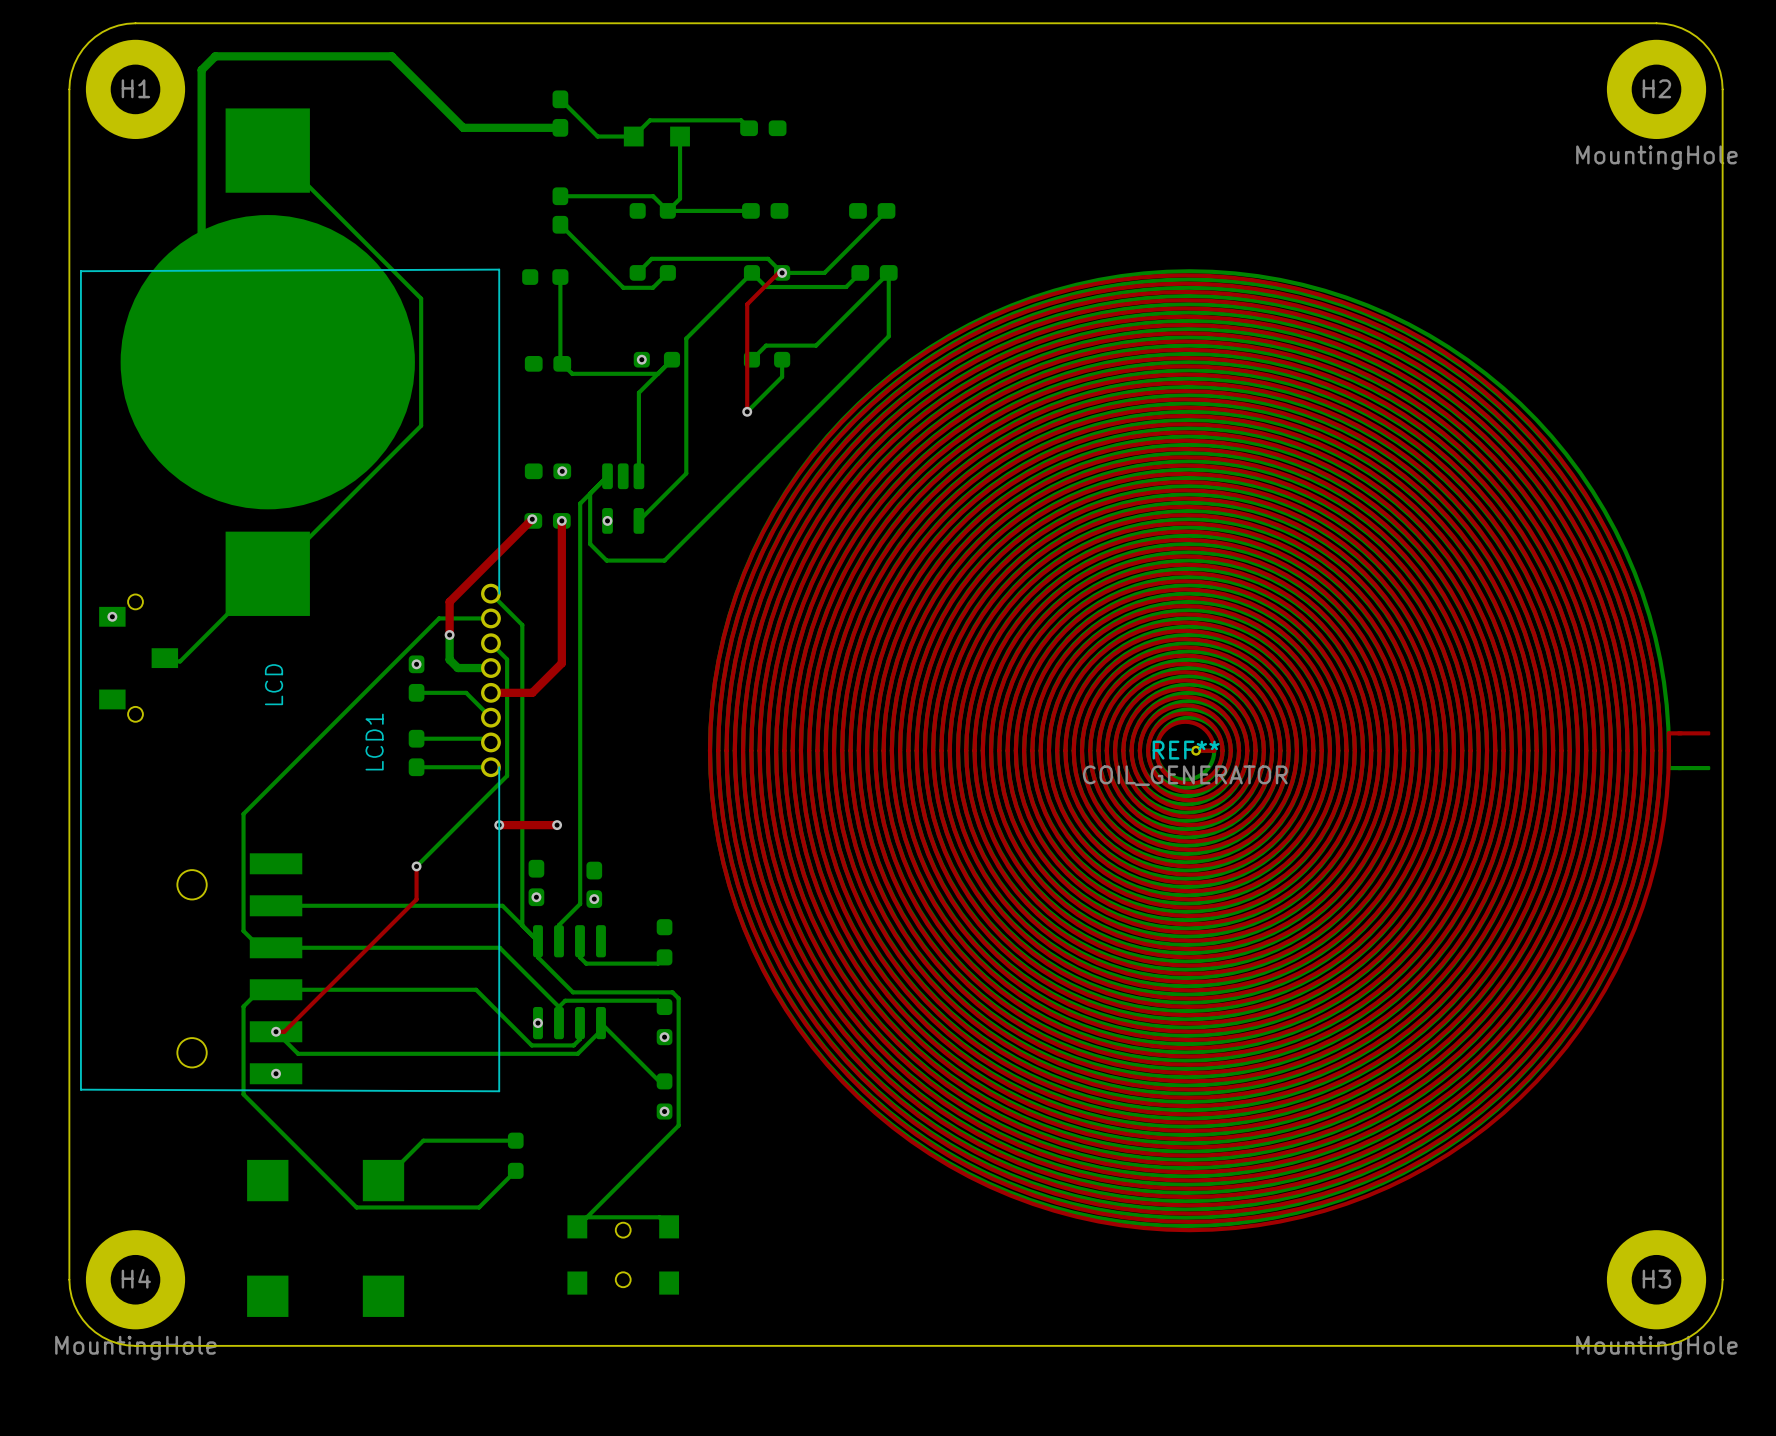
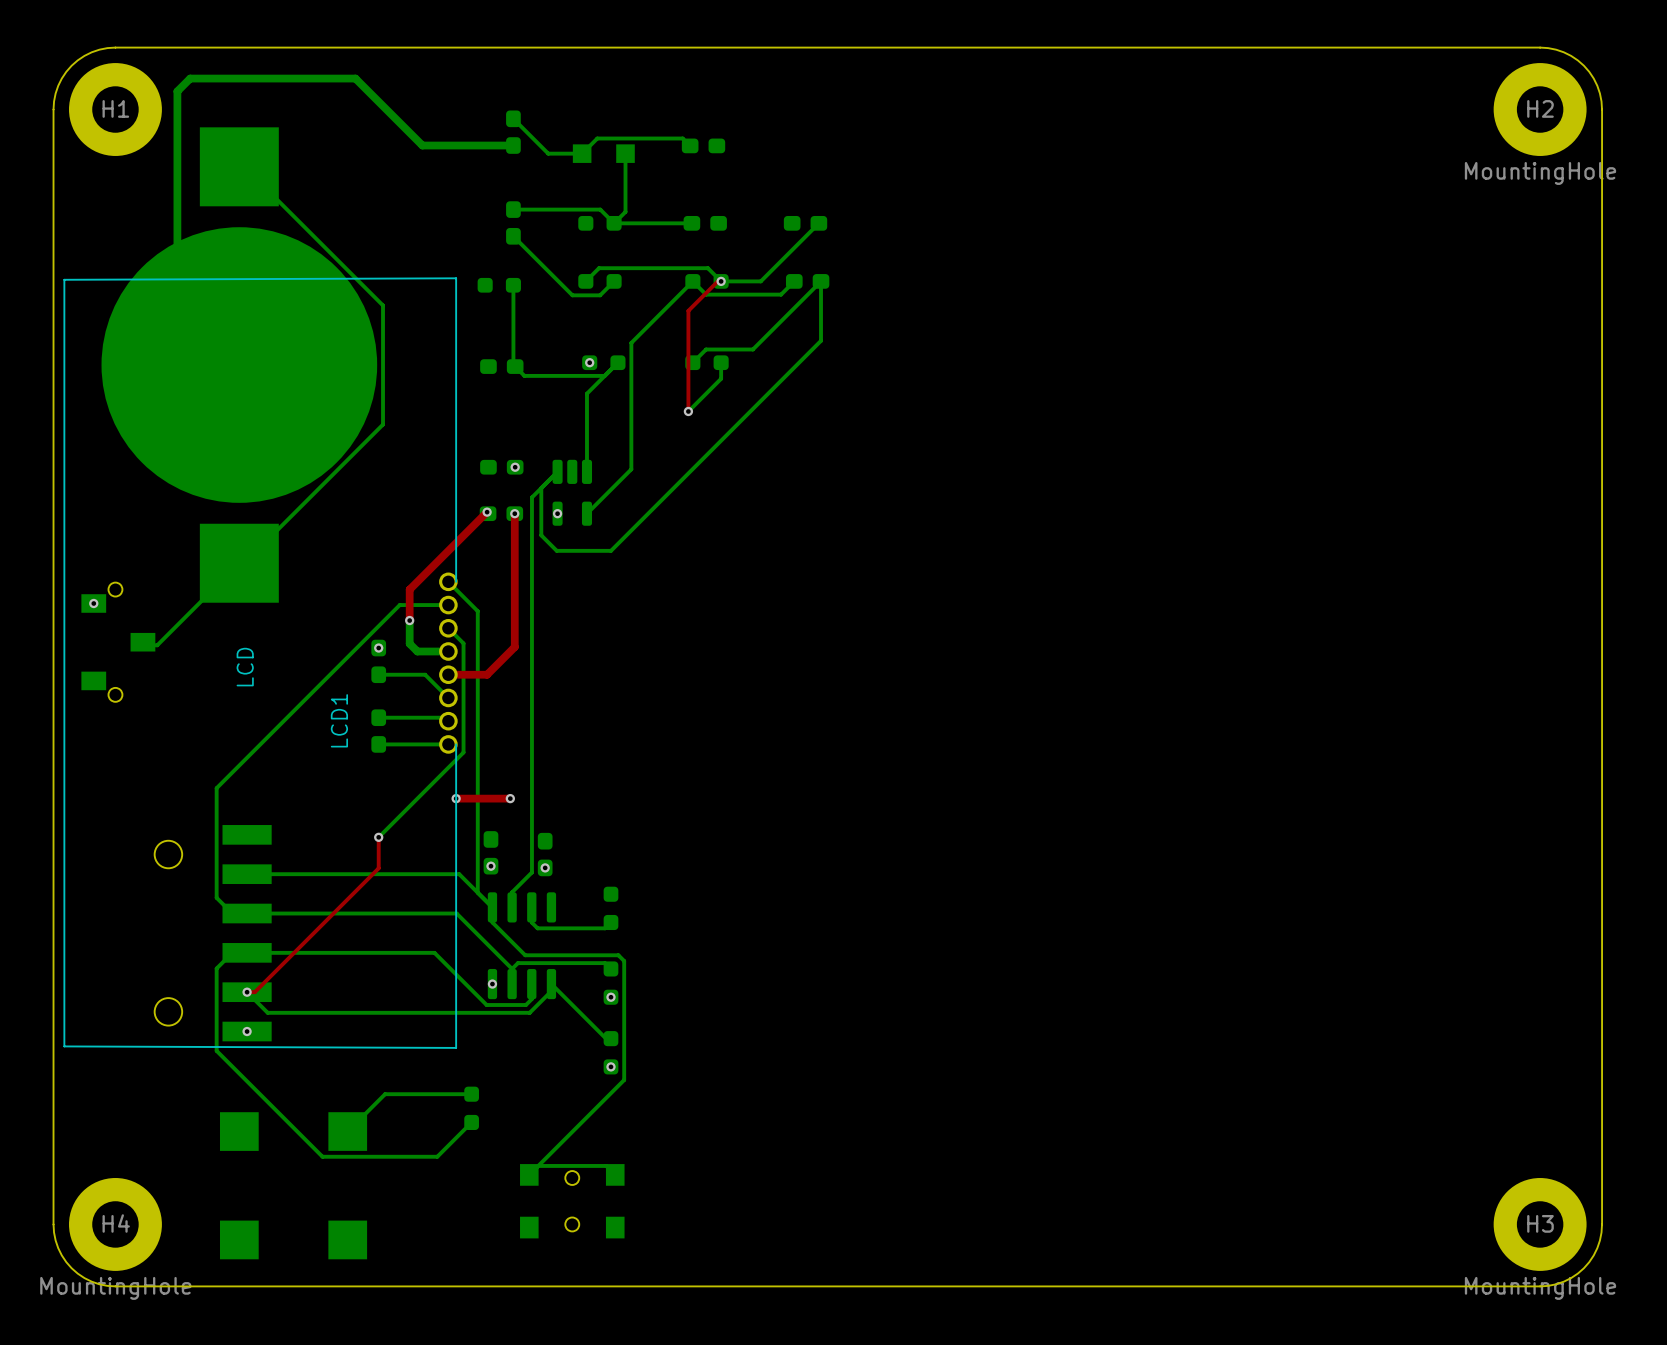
REF**: COIL_GENERATOR (1209, 750) -> none

